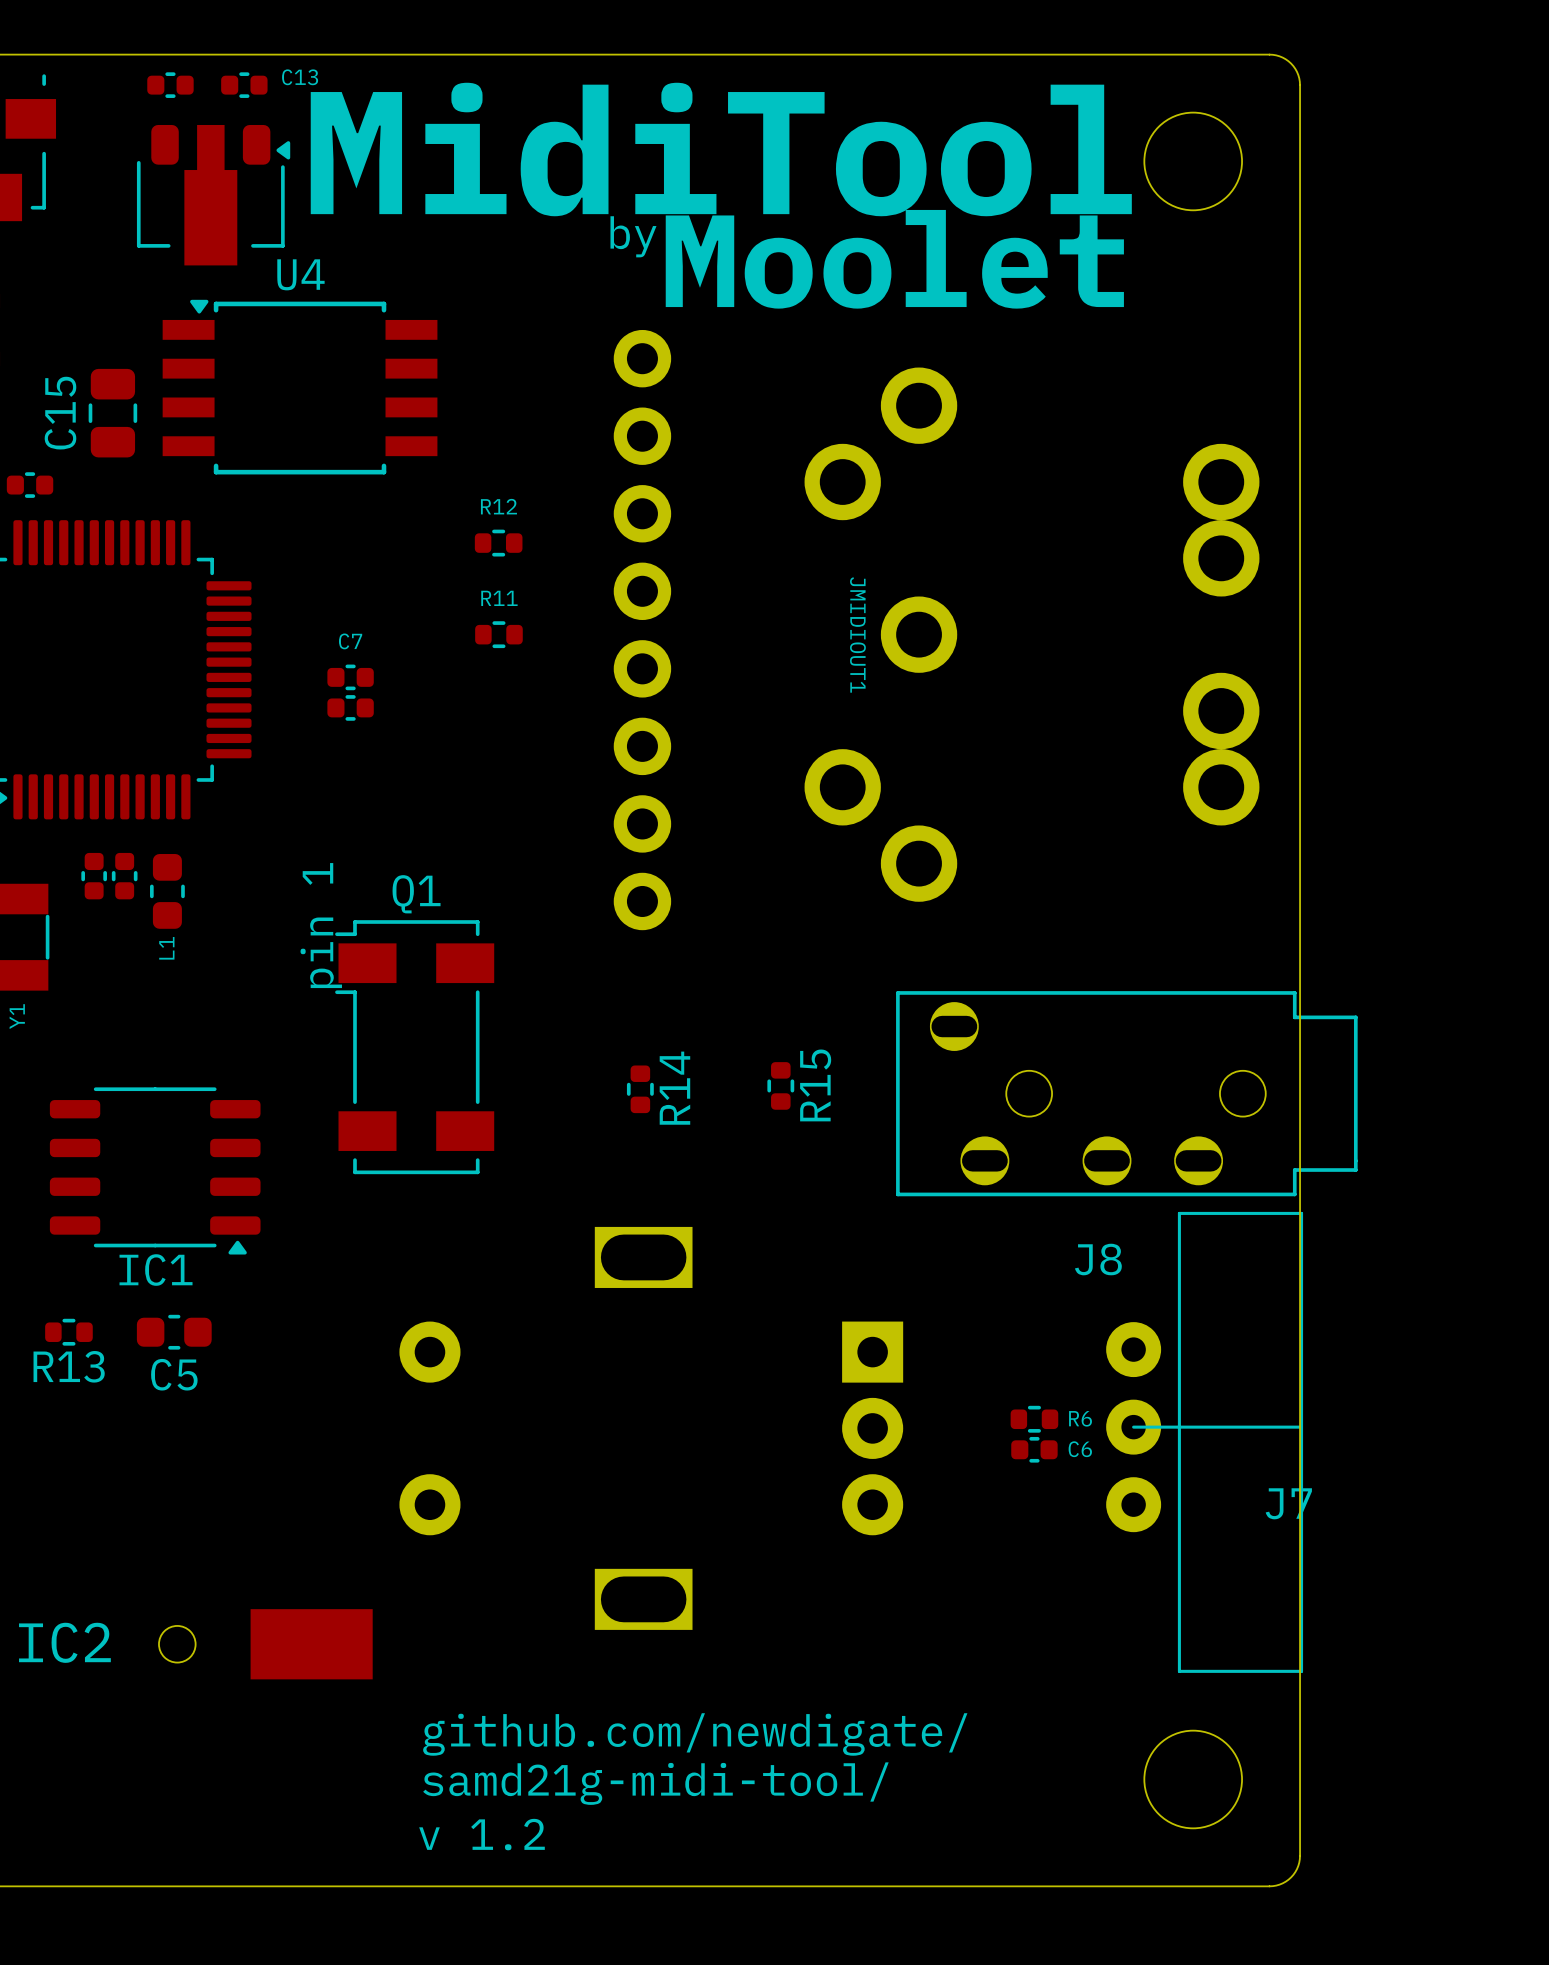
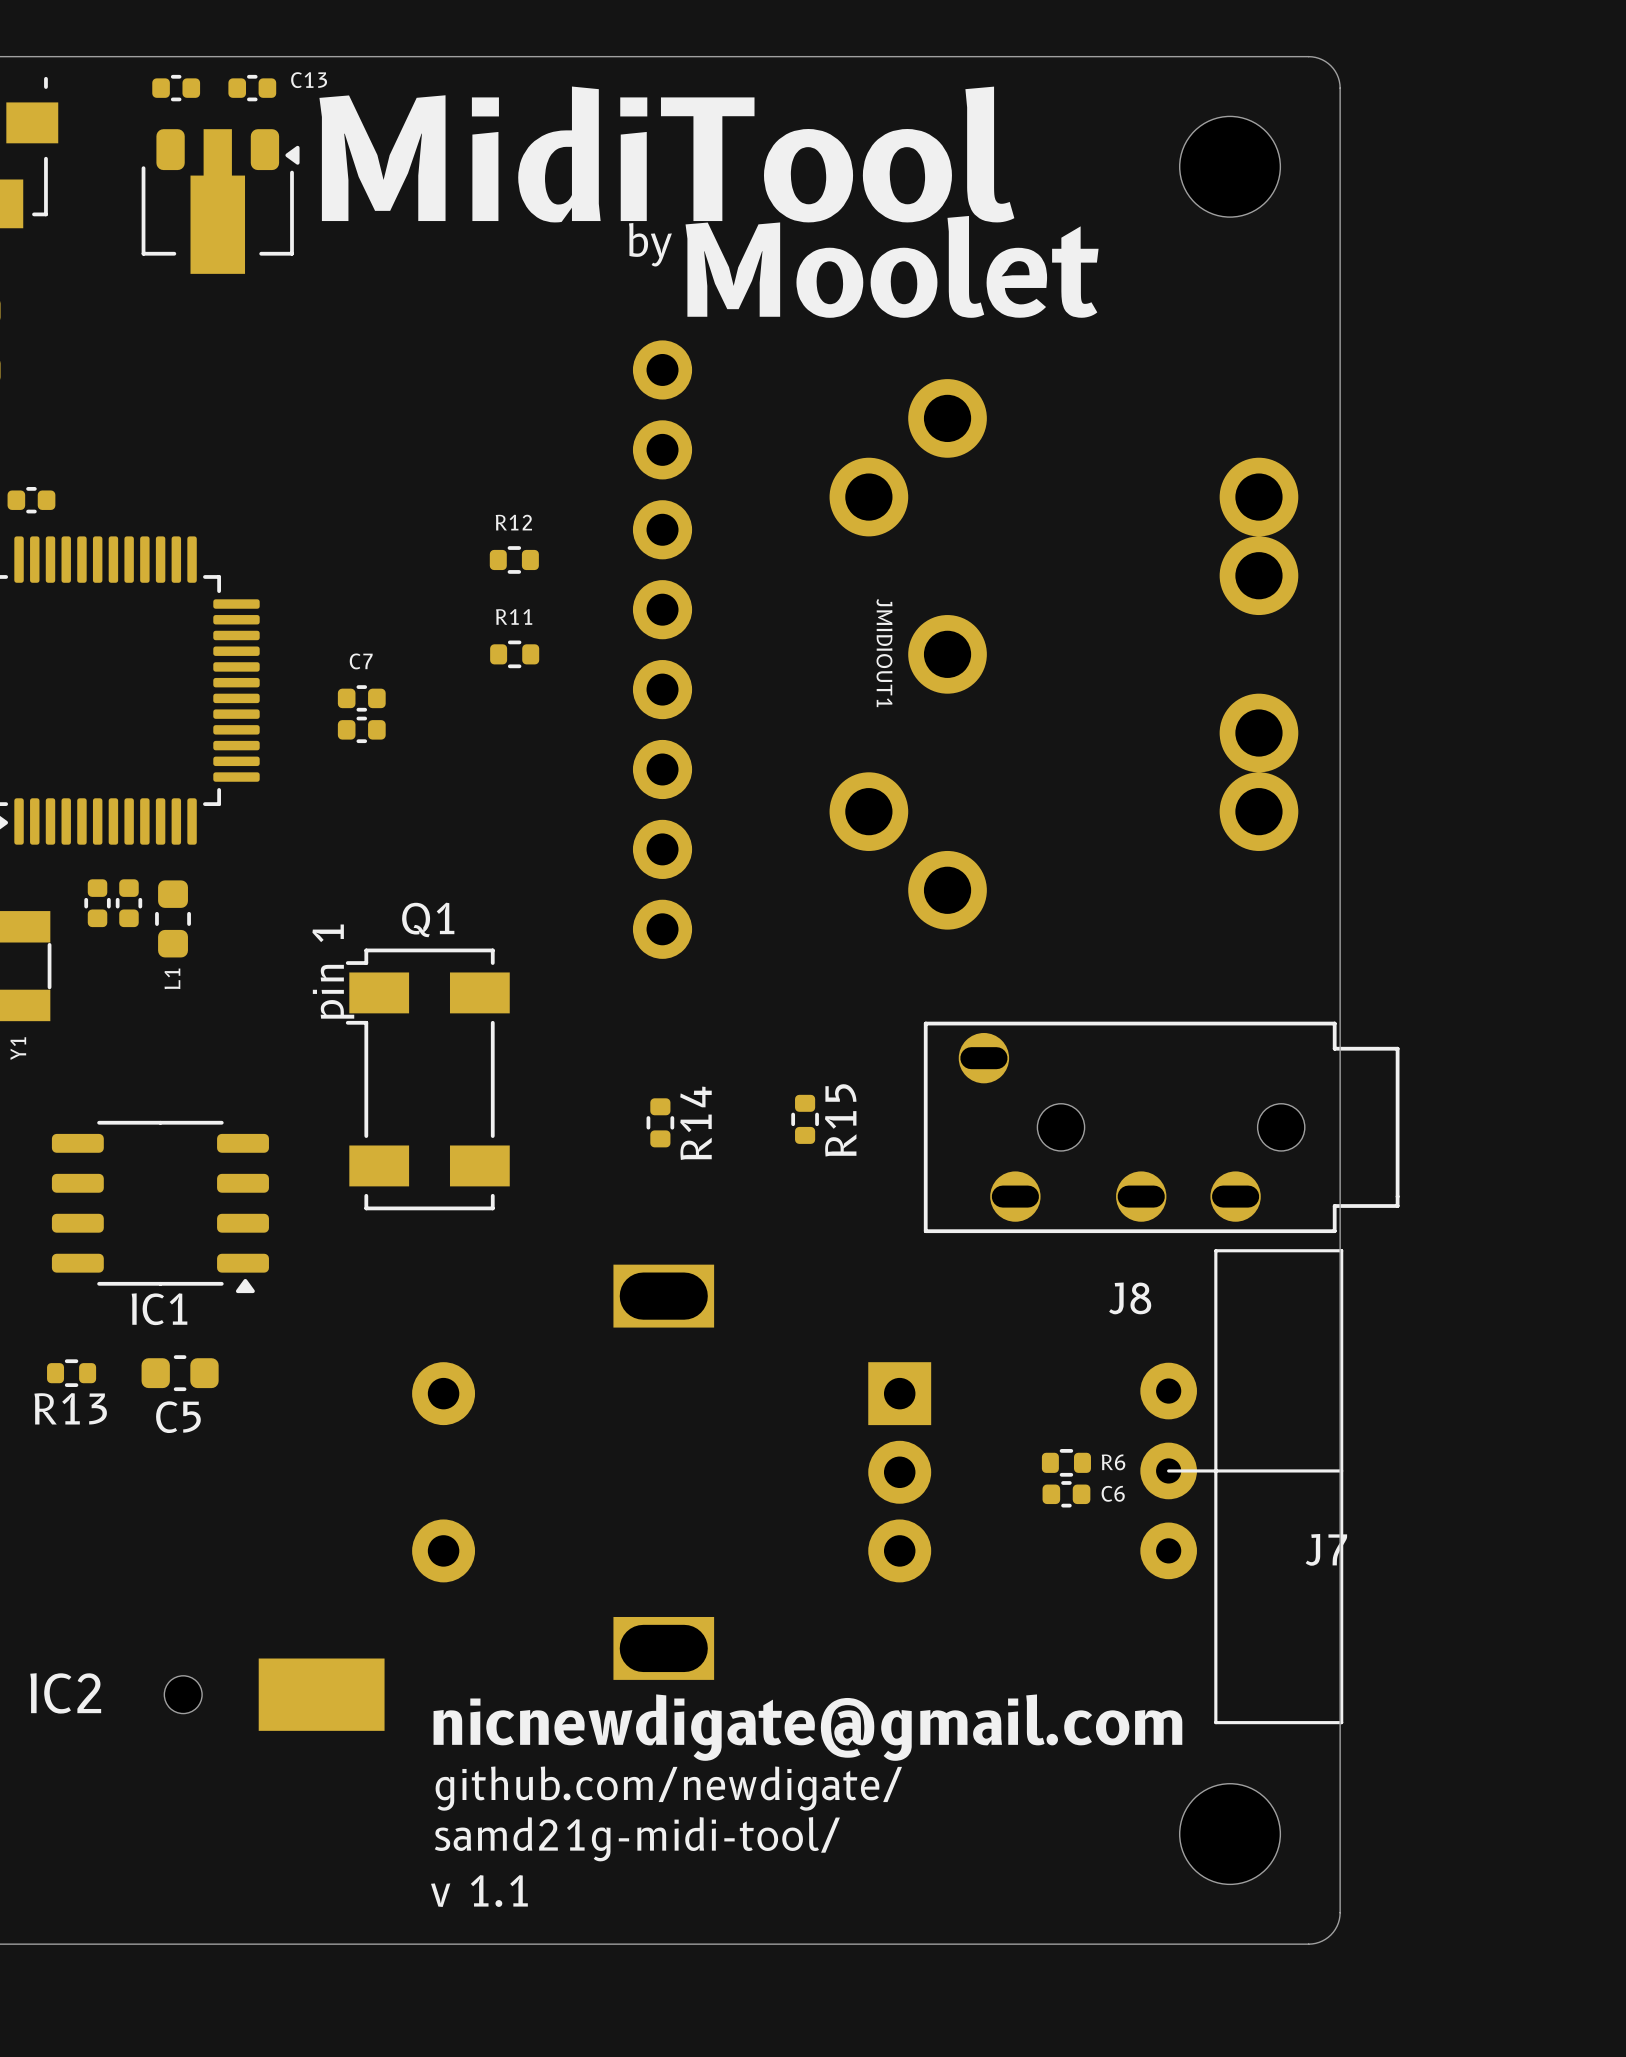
U4: (300, 387) -> none
C15: (112, 413) -> none
text: none -> nicnewdigate@gmail.com (807, 1727)
text: v 1.2 (481, 1834) -> v 1.1 (479, 1891)

